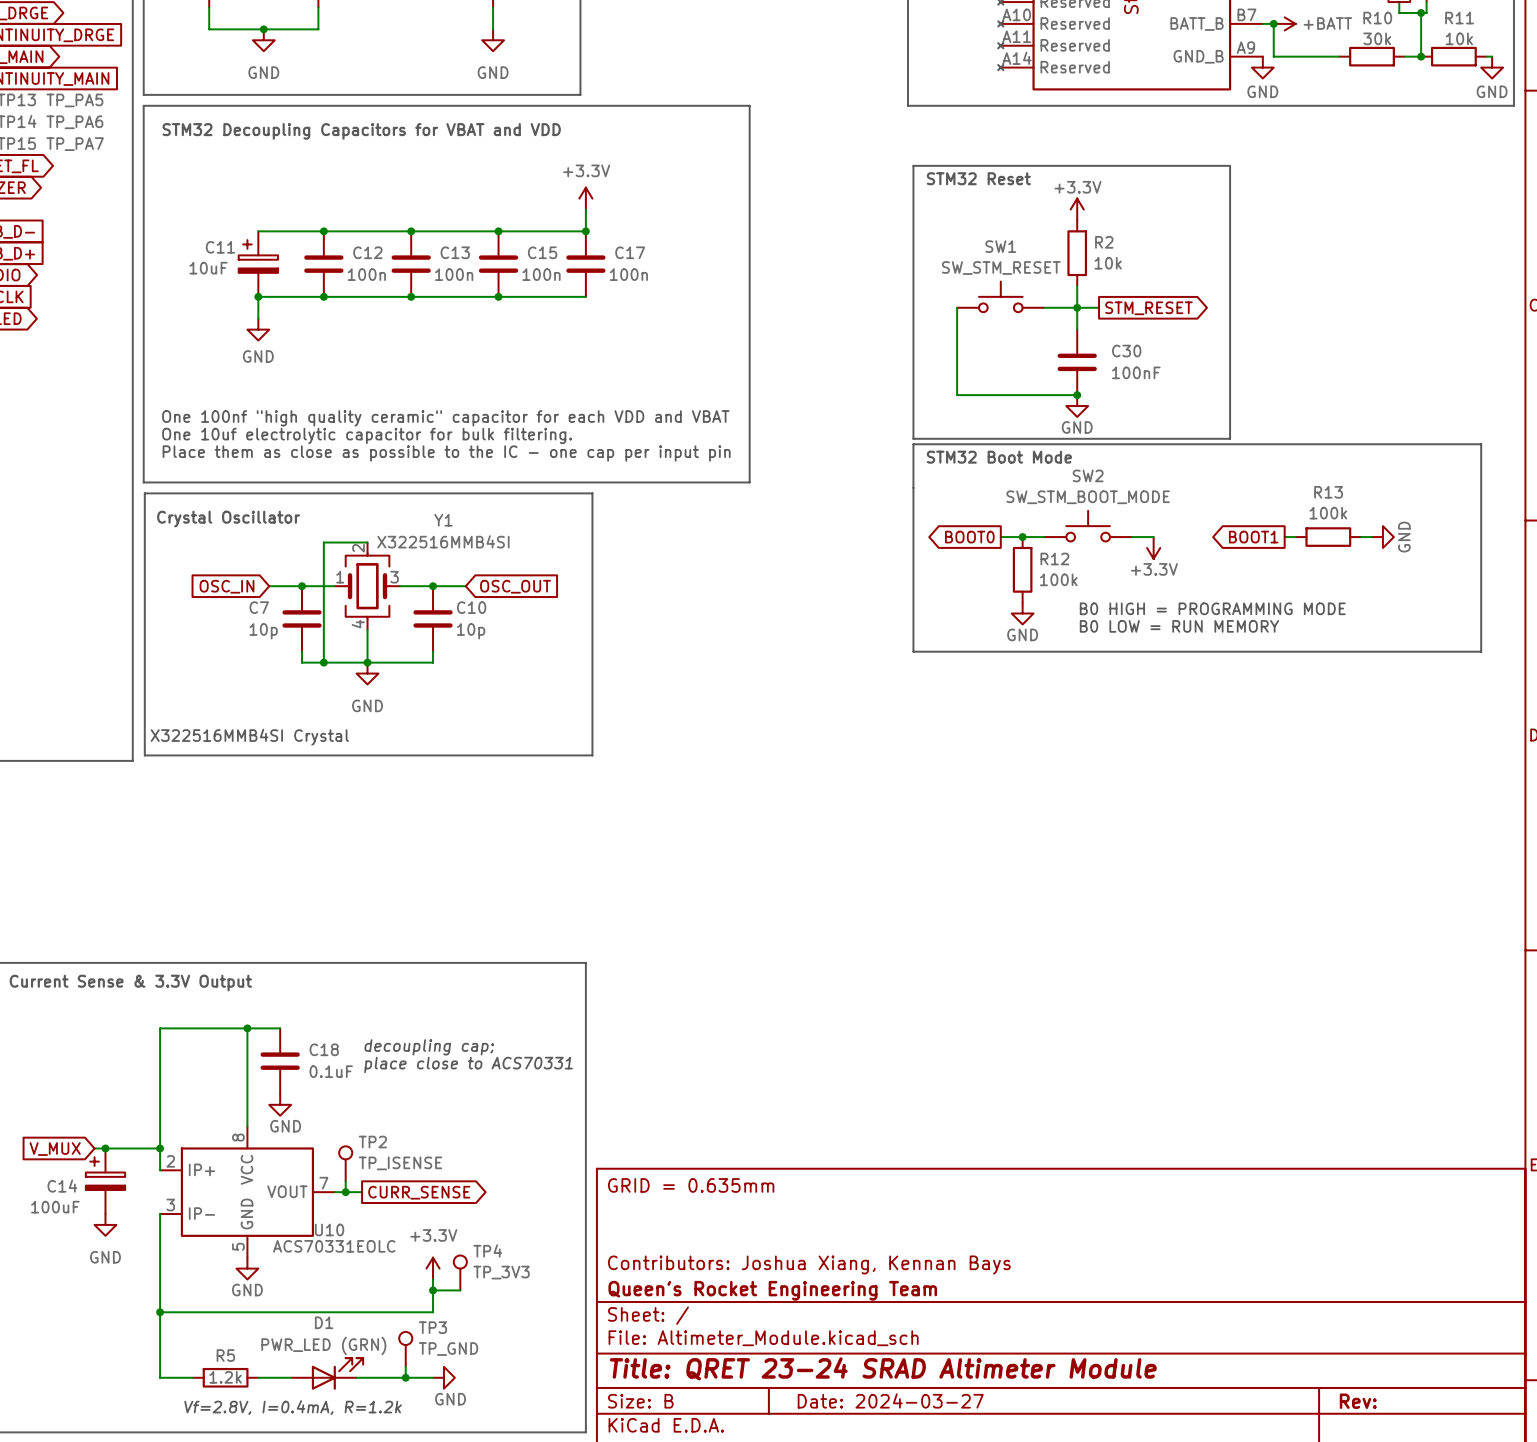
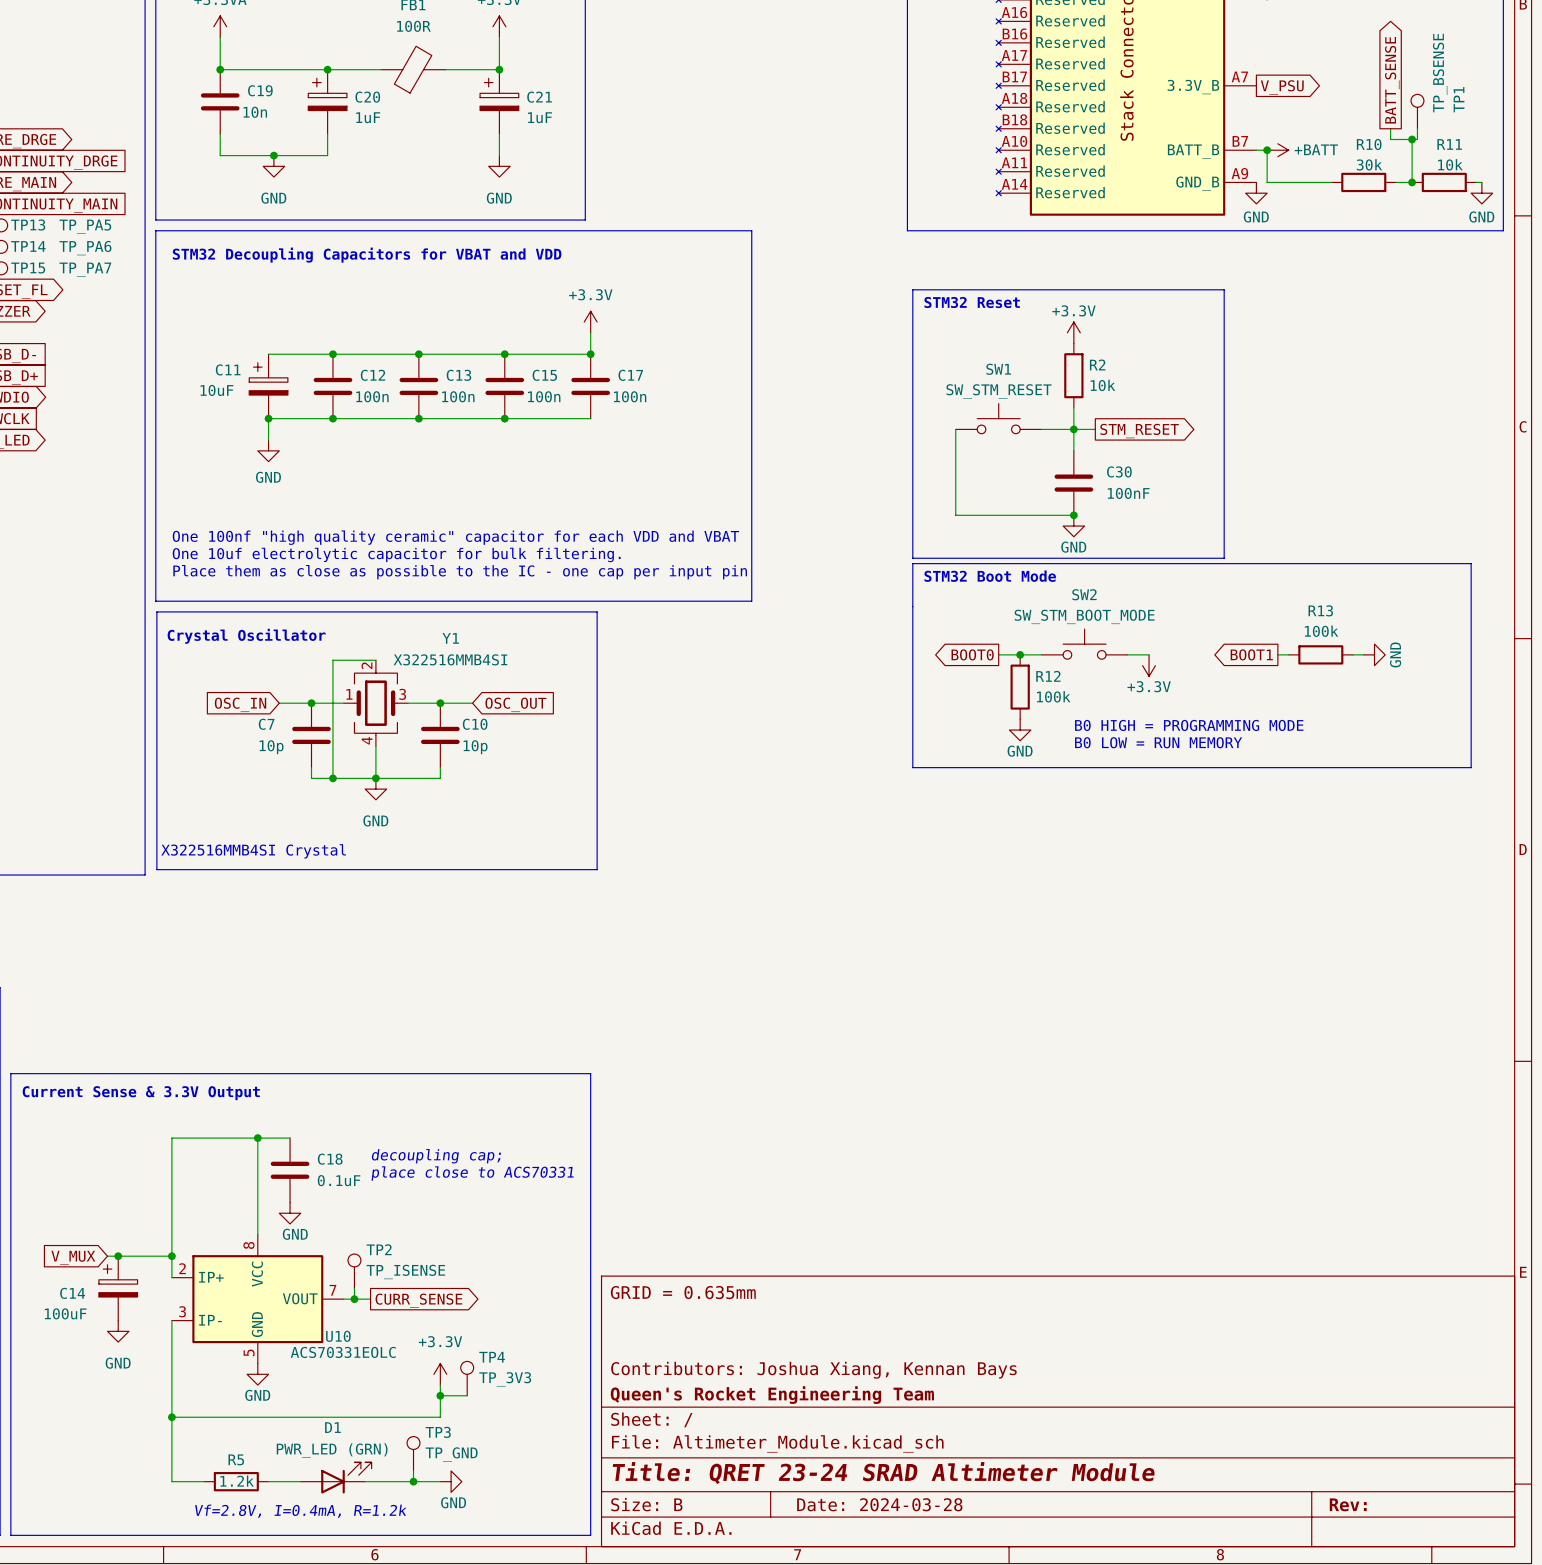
title block: Date: 2024-03-27 (890, 1400) -> Date: 2024-03-28 (879, 1504)

